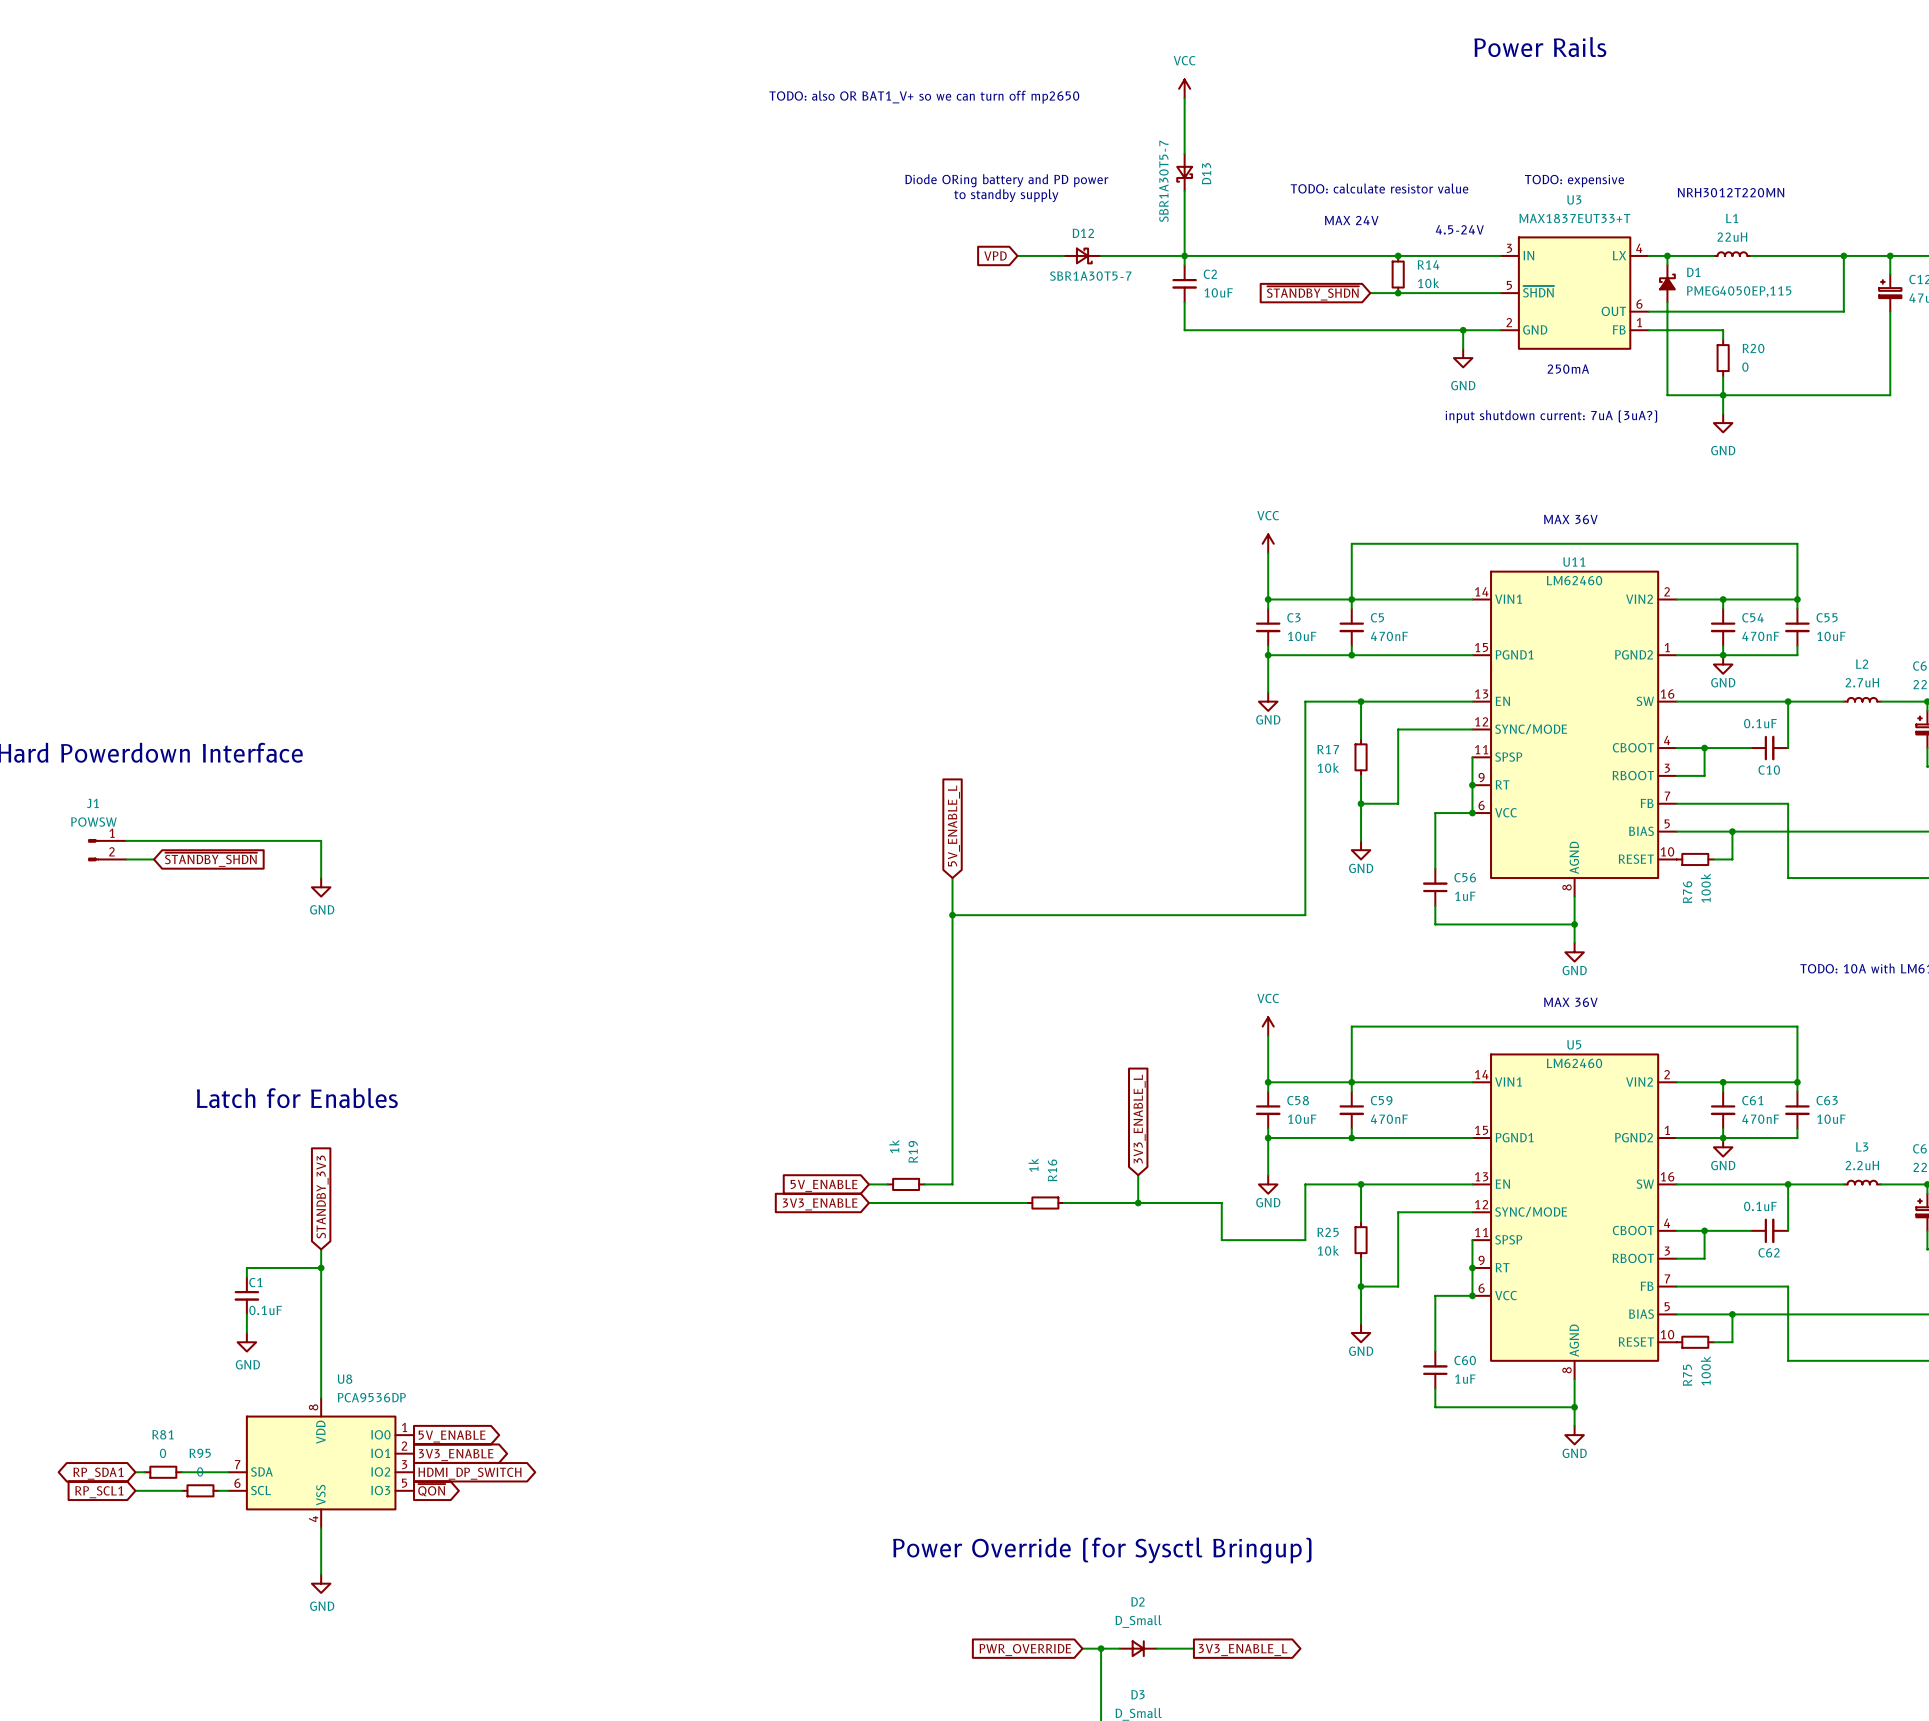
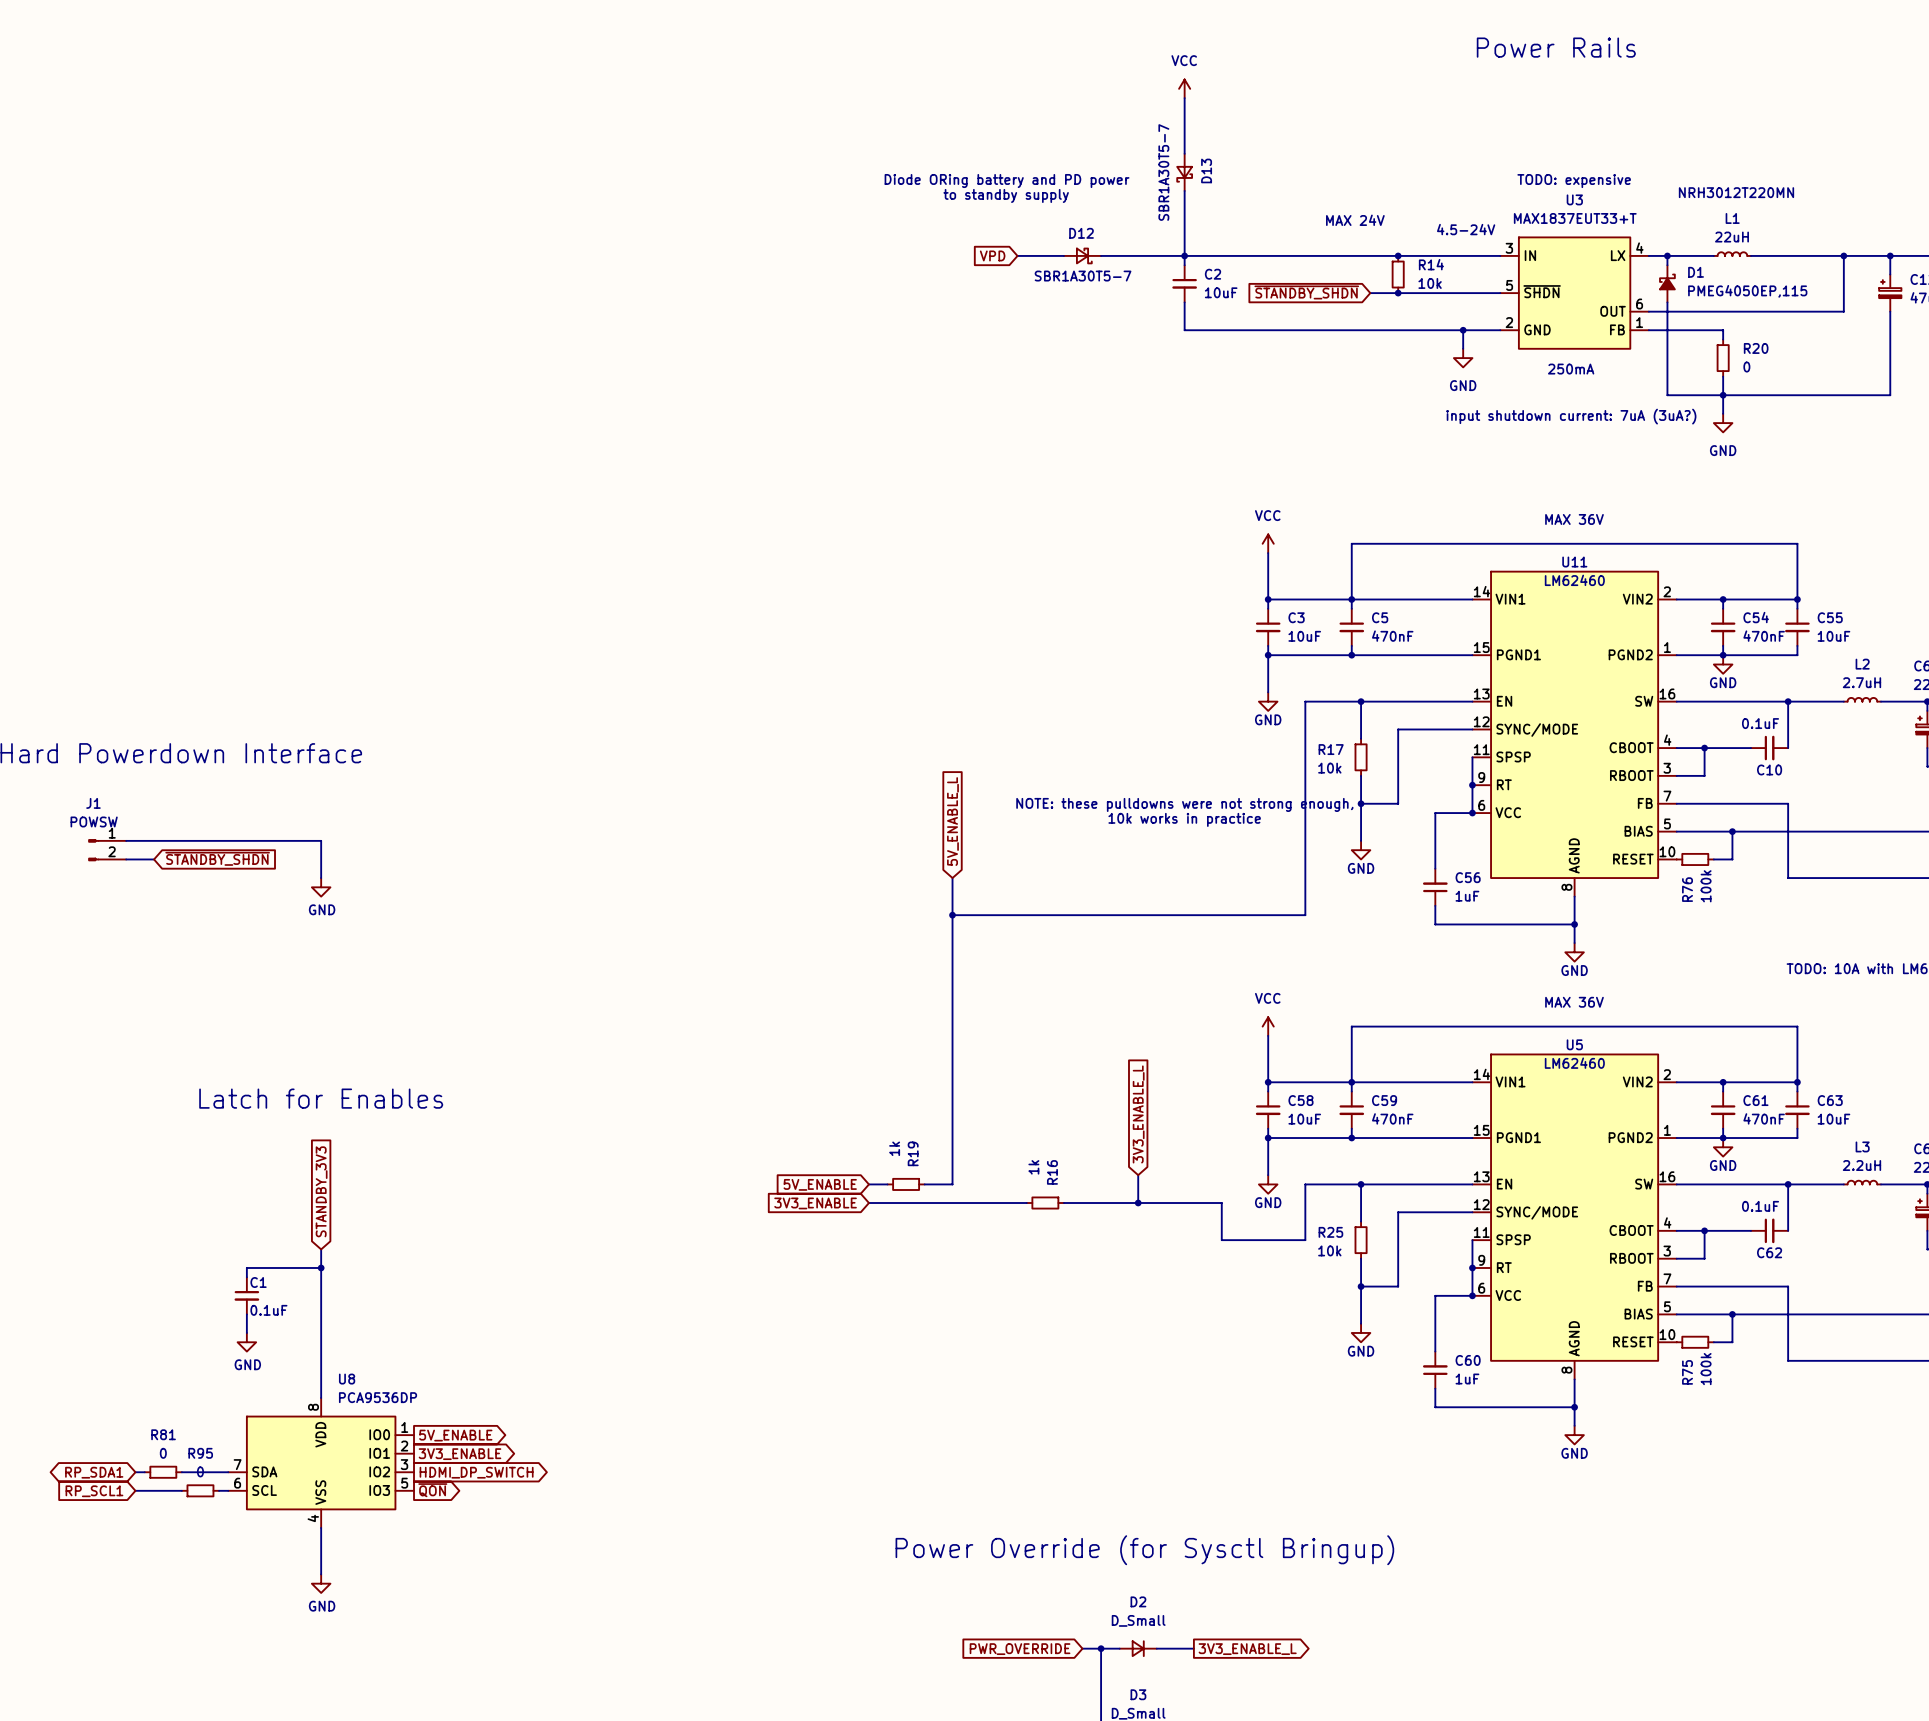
text: TODO: also OR BAT1_V+ so we can turn off mp2650 (924, 97) -> none
text: TODO: calculate resistor value (1379, 188) -> none
text: none -> NOTE: these pulldowns were not strong enough, (1184, 804)
text: none -> 10k works in practice (1184, 819)

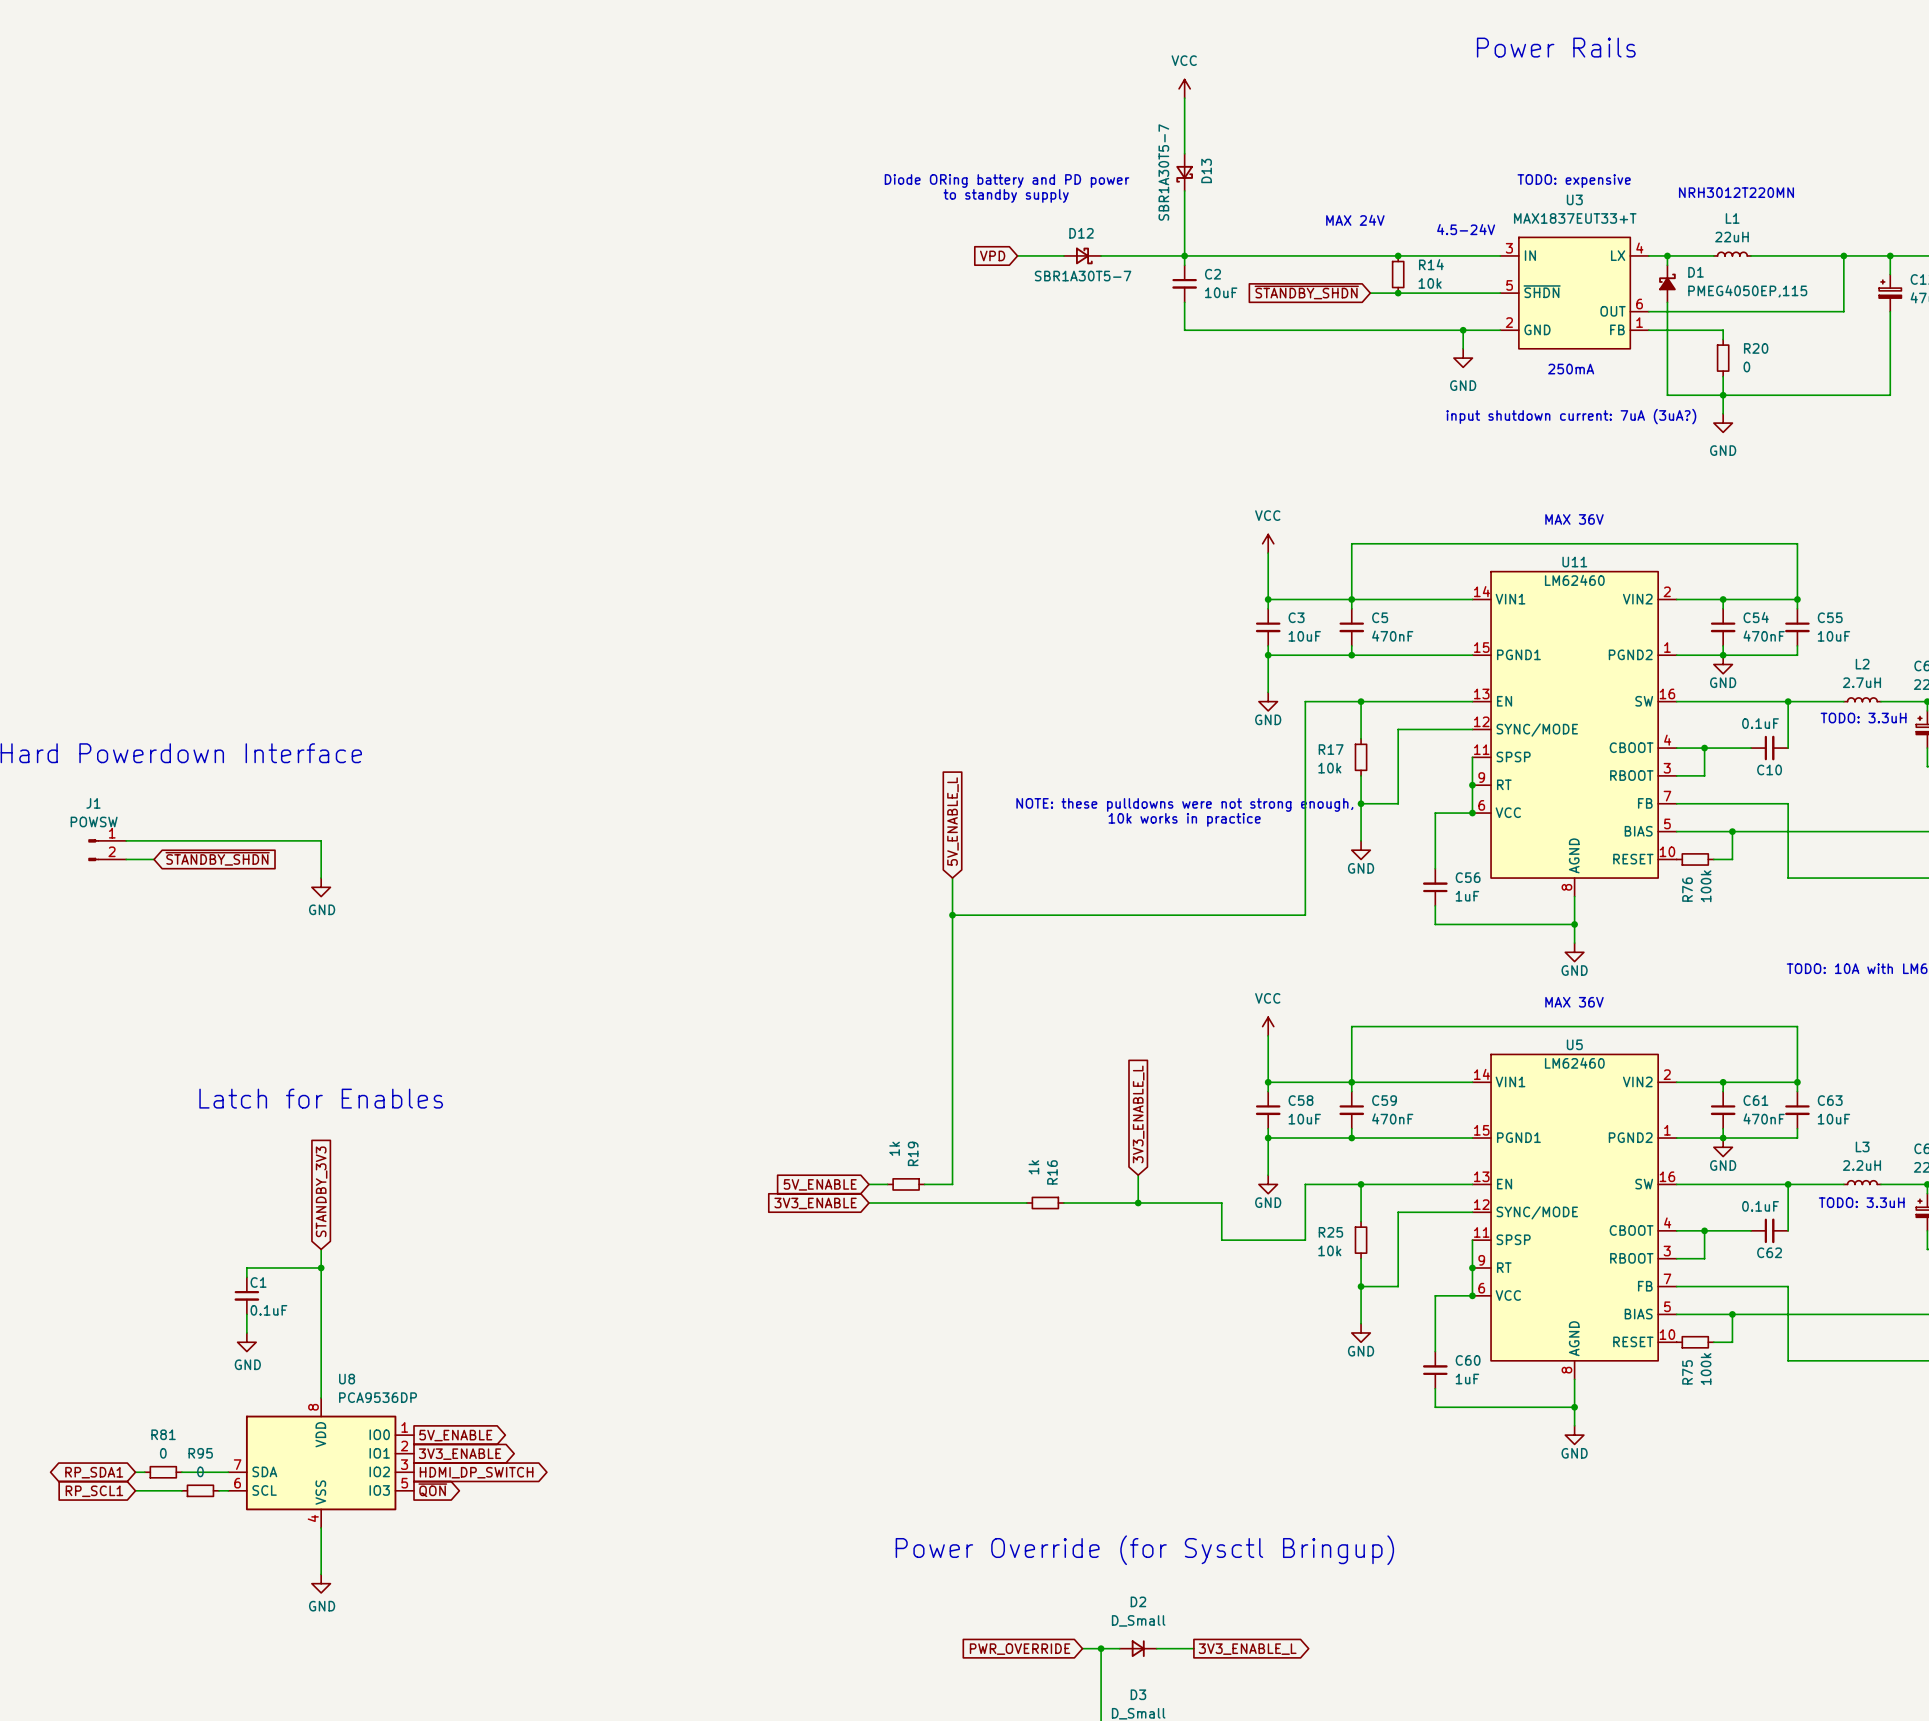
text: none -> TODO: 3.3uH (1863, 718)
text: none -> TODO: 3.3uH (1861, 1202)

